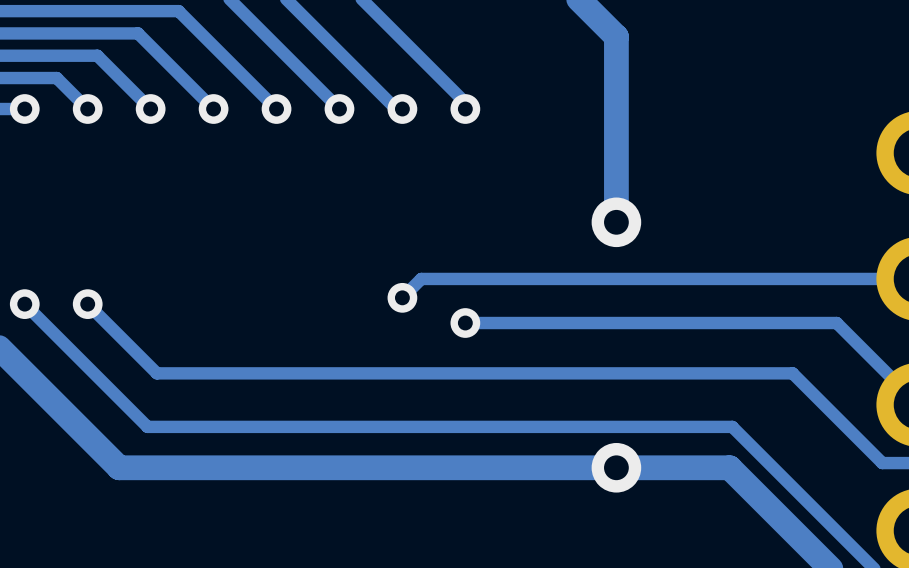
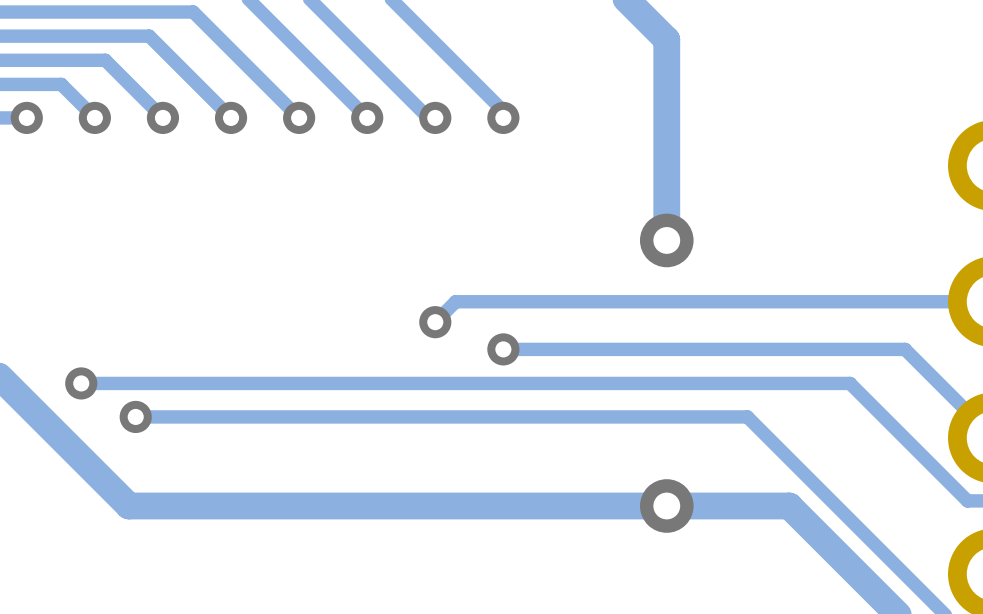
track: (24, 304) (147, 426) (732, 426) -> (135, 416) (747, 416) (792, 461)
via: (24, 304) -> none
track: (87, 304) (156, 373) (792, 373) (882, 463) (894, 463) -> (81, 383) (850, 383) (967, 500)
via: (87, 304) -> none
via: none -> (81, 383)
via: none -> (135, 416)

